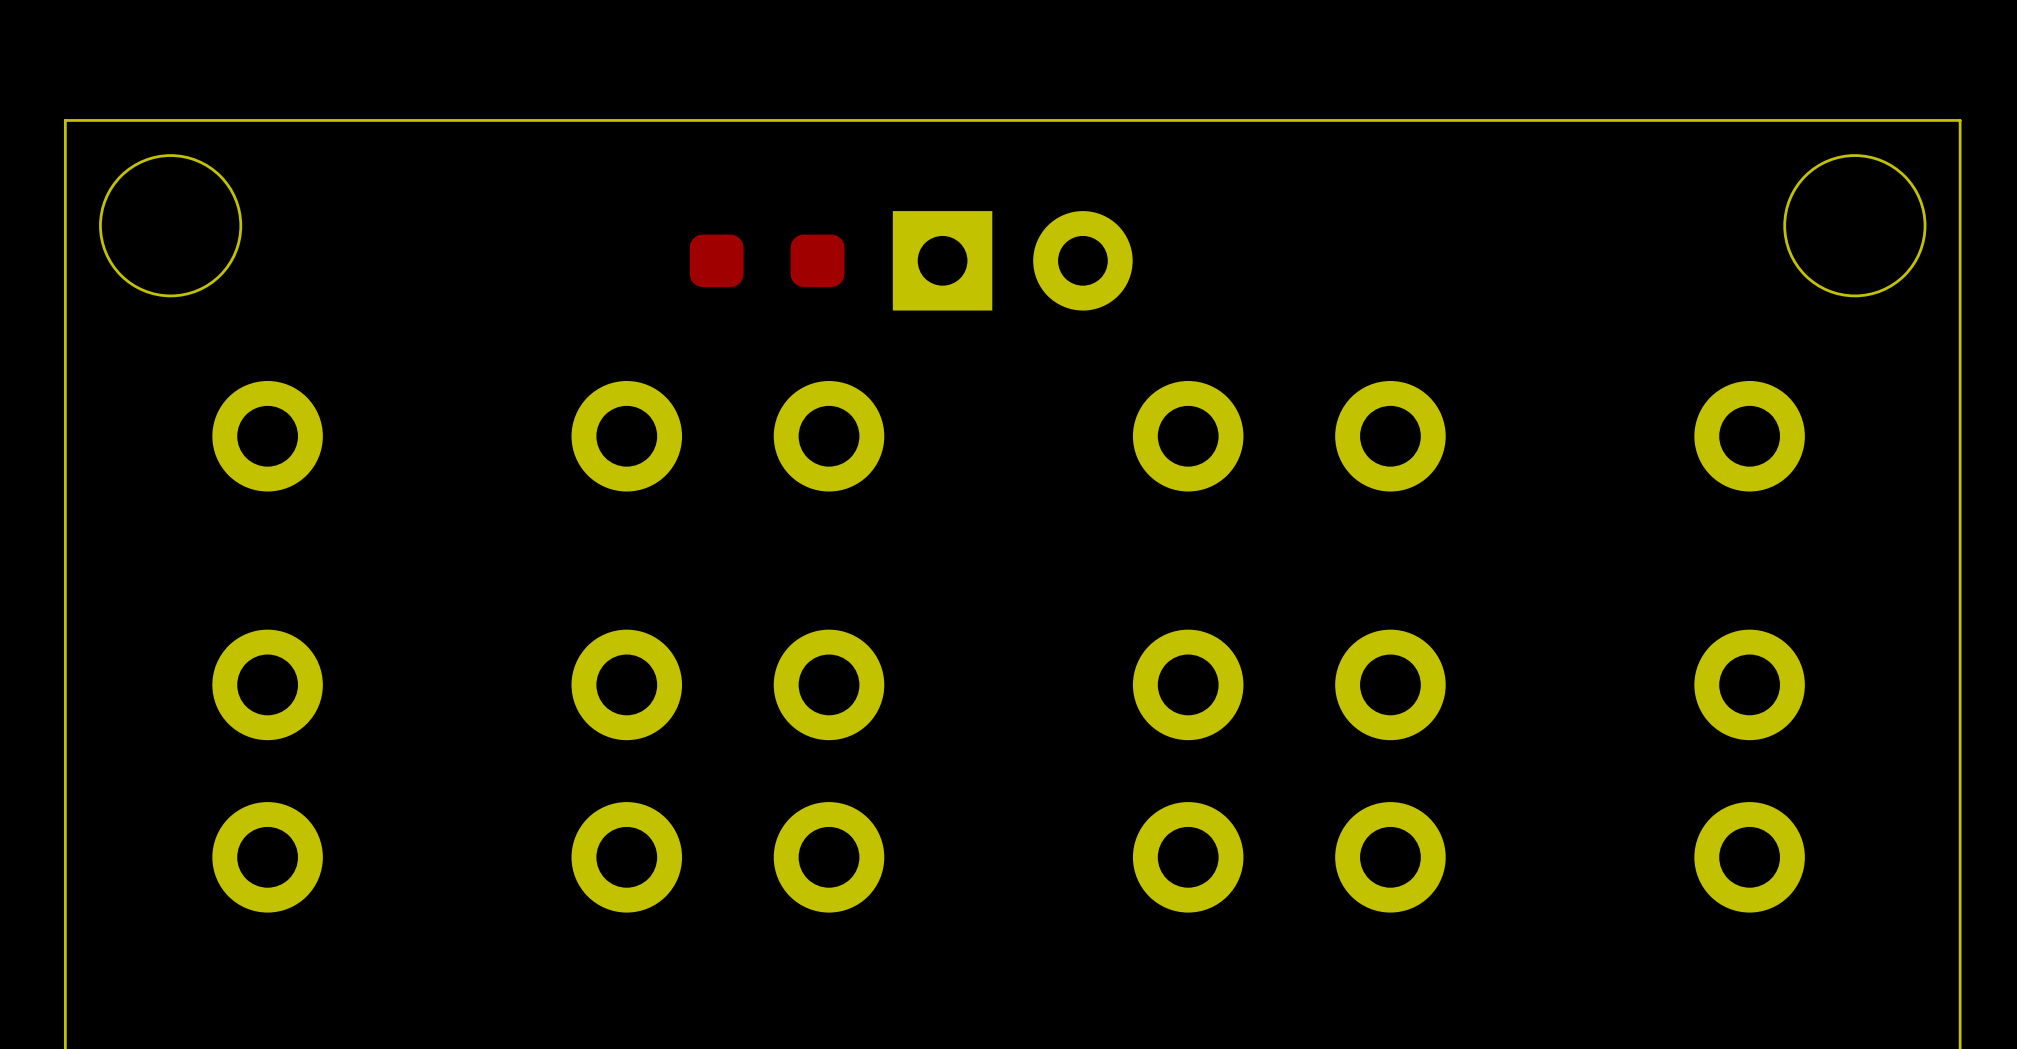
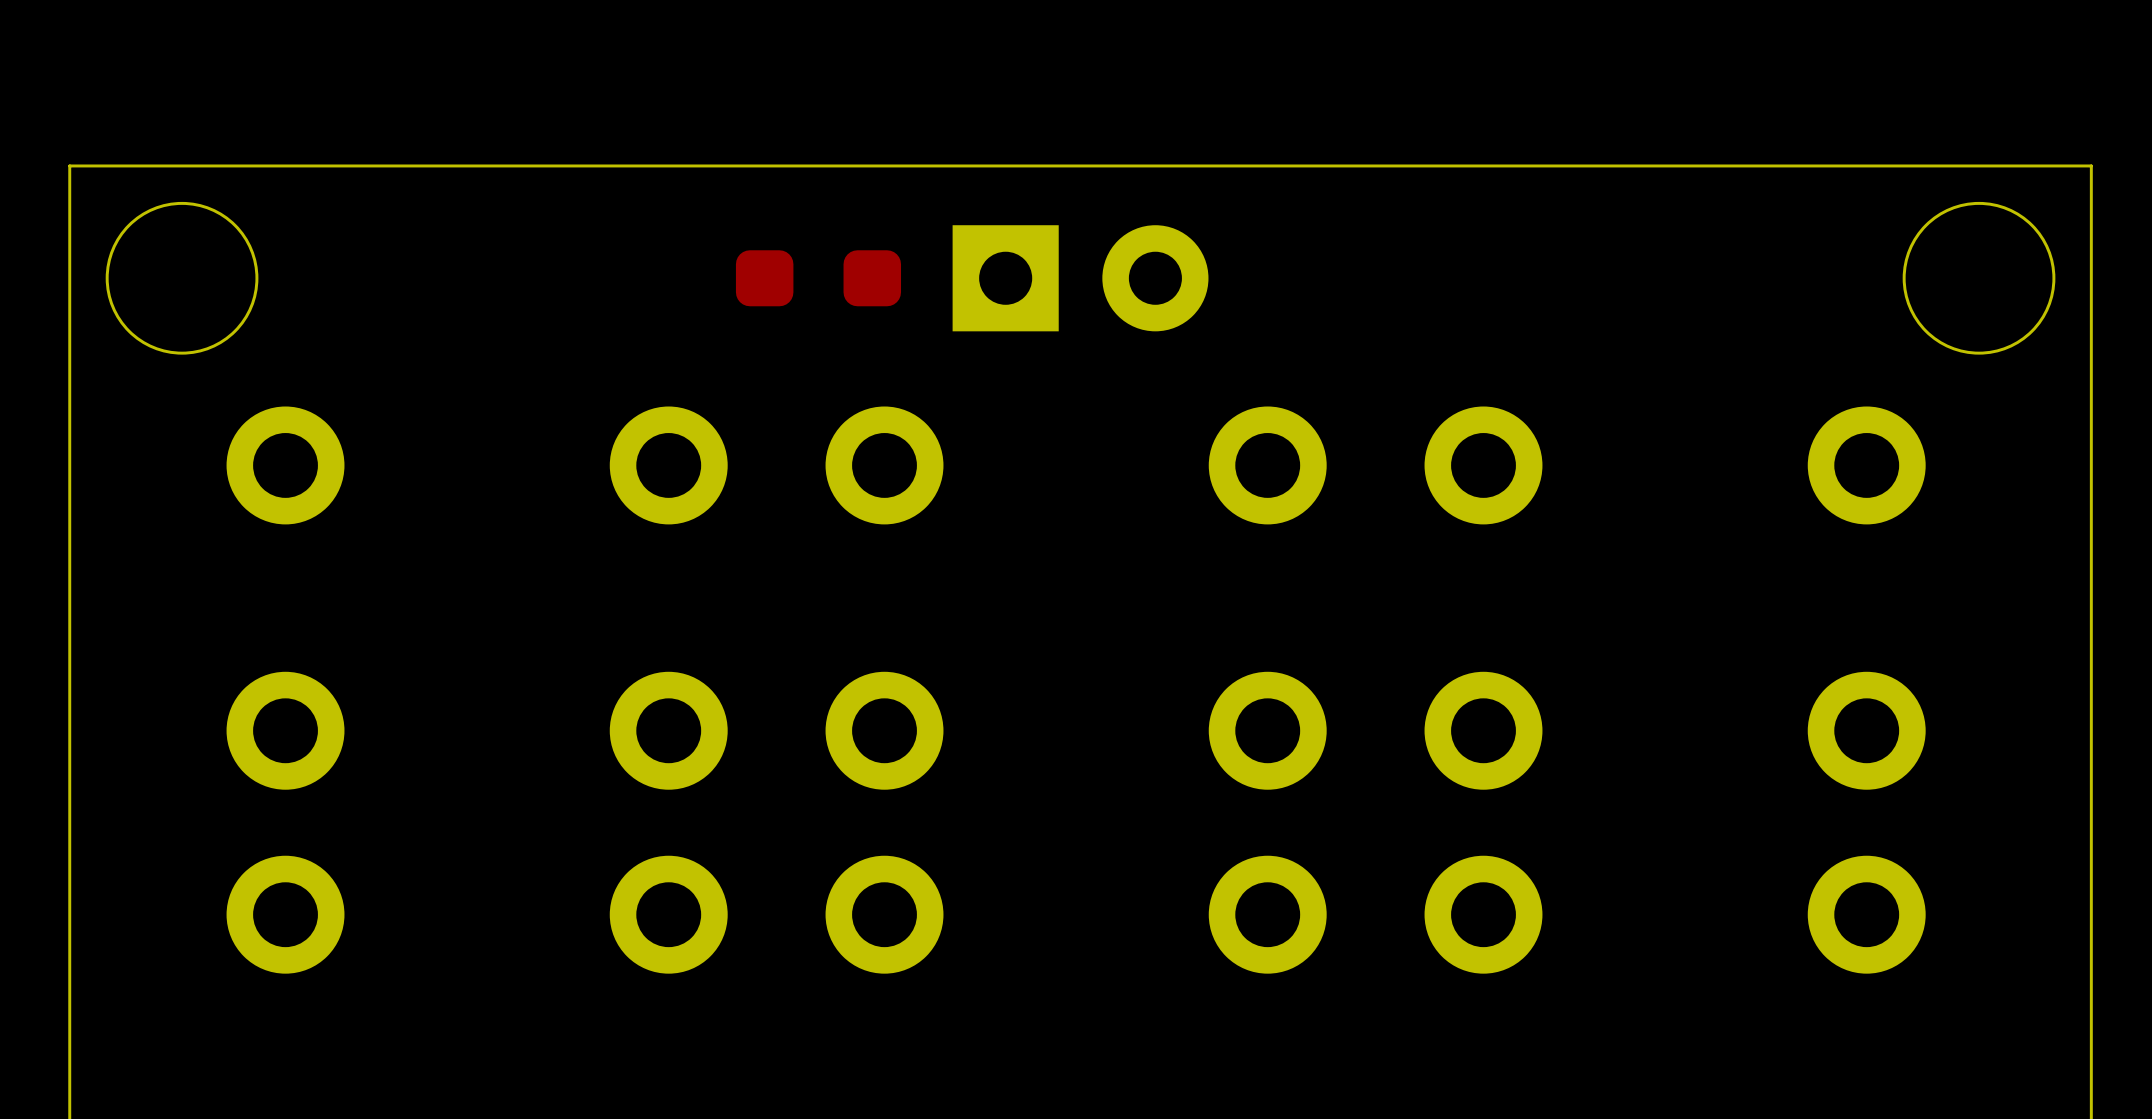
board edge: (1960, 155) (1960, 120) (65, 120) (65, 155) -> (2091, 165) (69, 165)
round board edge position: (170, 225) -> (182, 278)
round board edge position: (1854, 225) -> (1979, 278)

